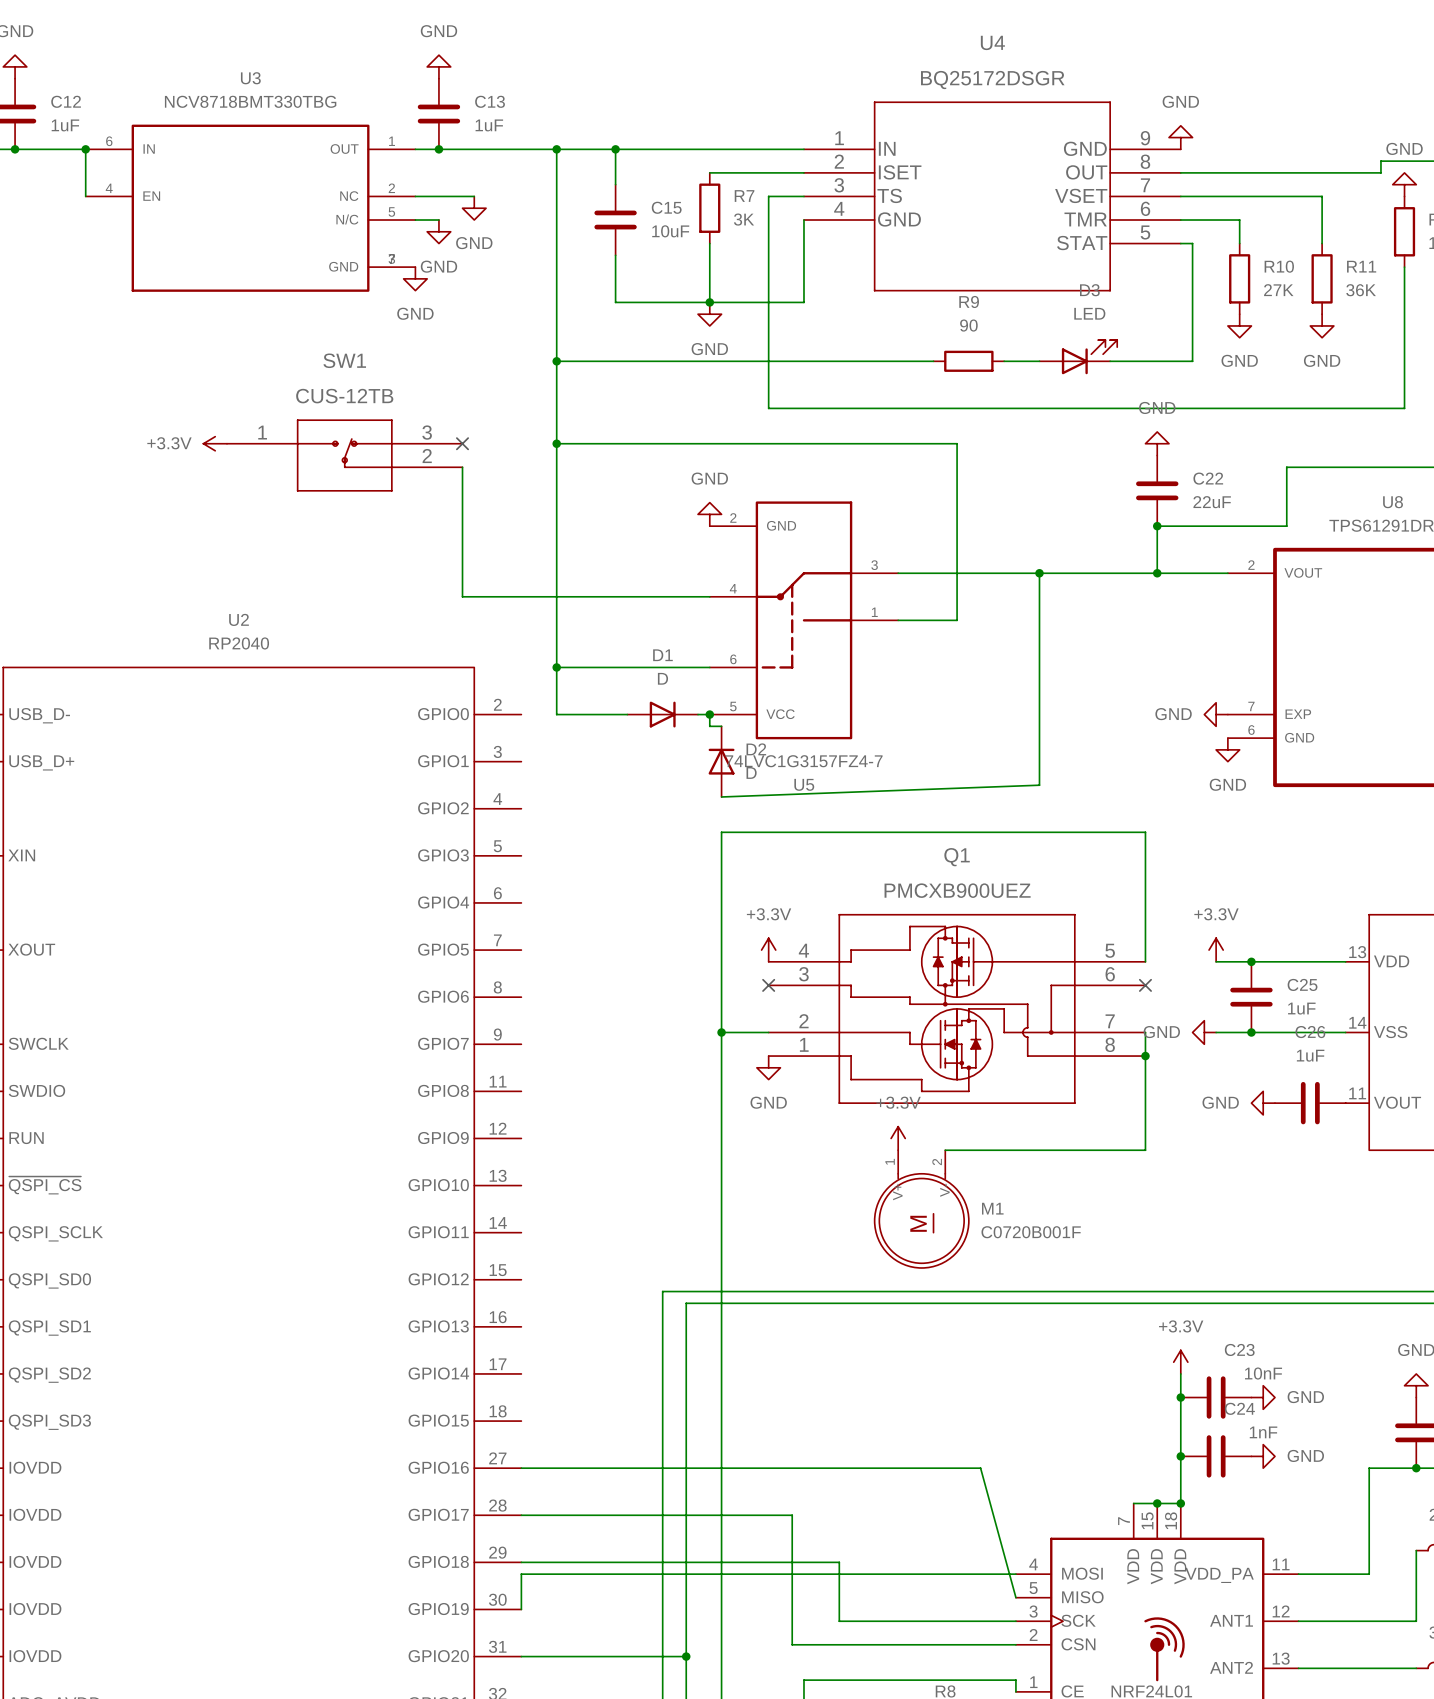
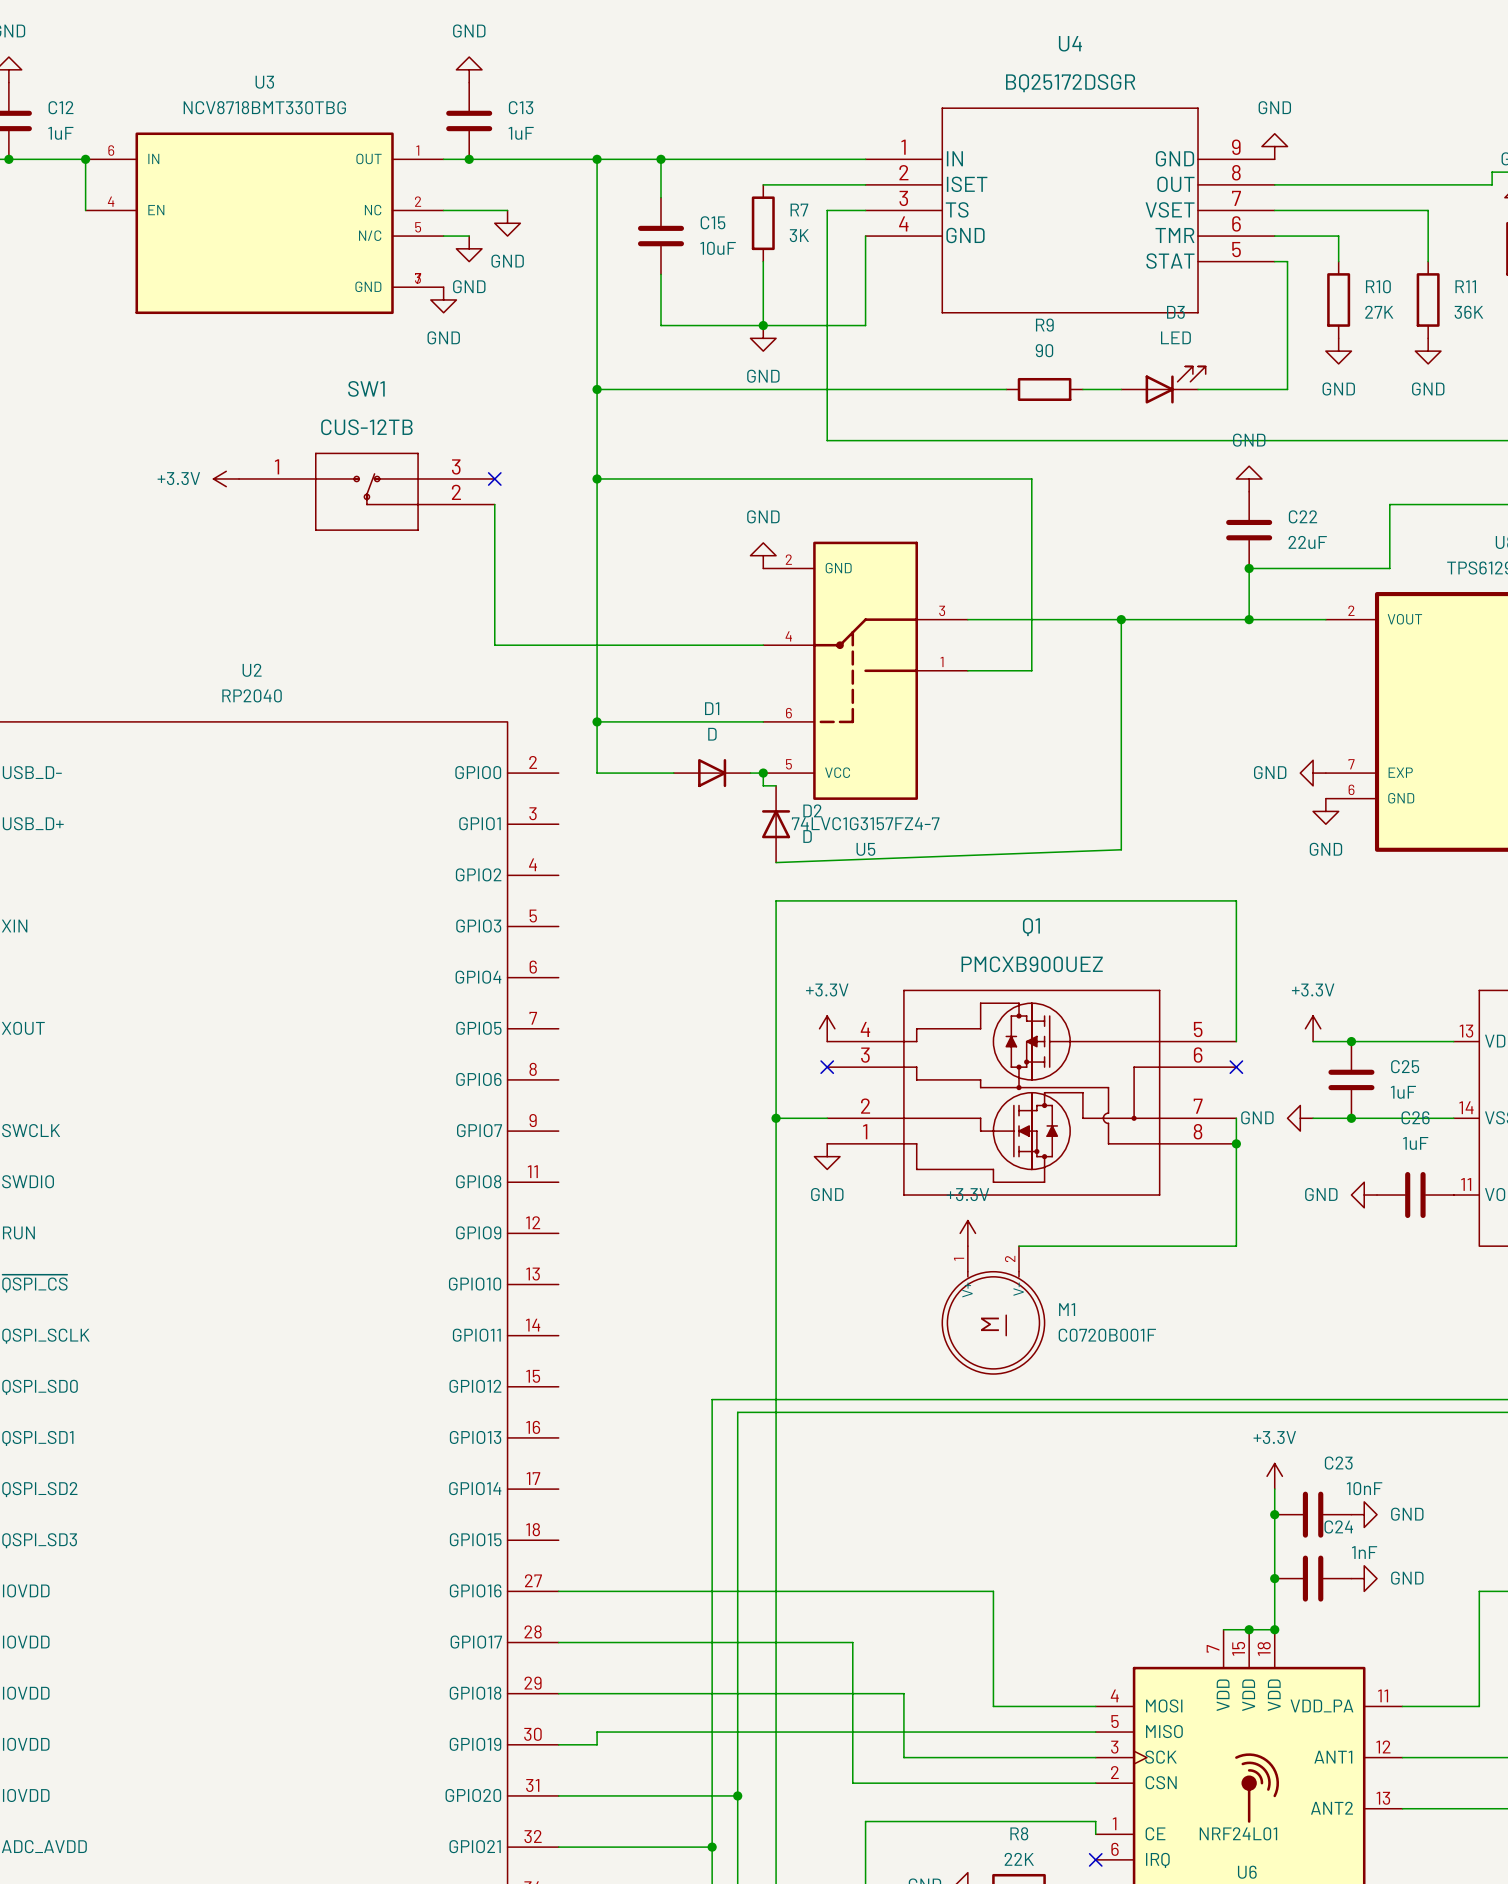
wire: (921, 1468) (980, 1468) (1015, 1597) -> (993, 1591) (993, 1706)
wire: (921, 1574) (521, 1574) (521, 1609) -> (1095, 1732) (597, 1732) (597, 1744) (558, 1744)

